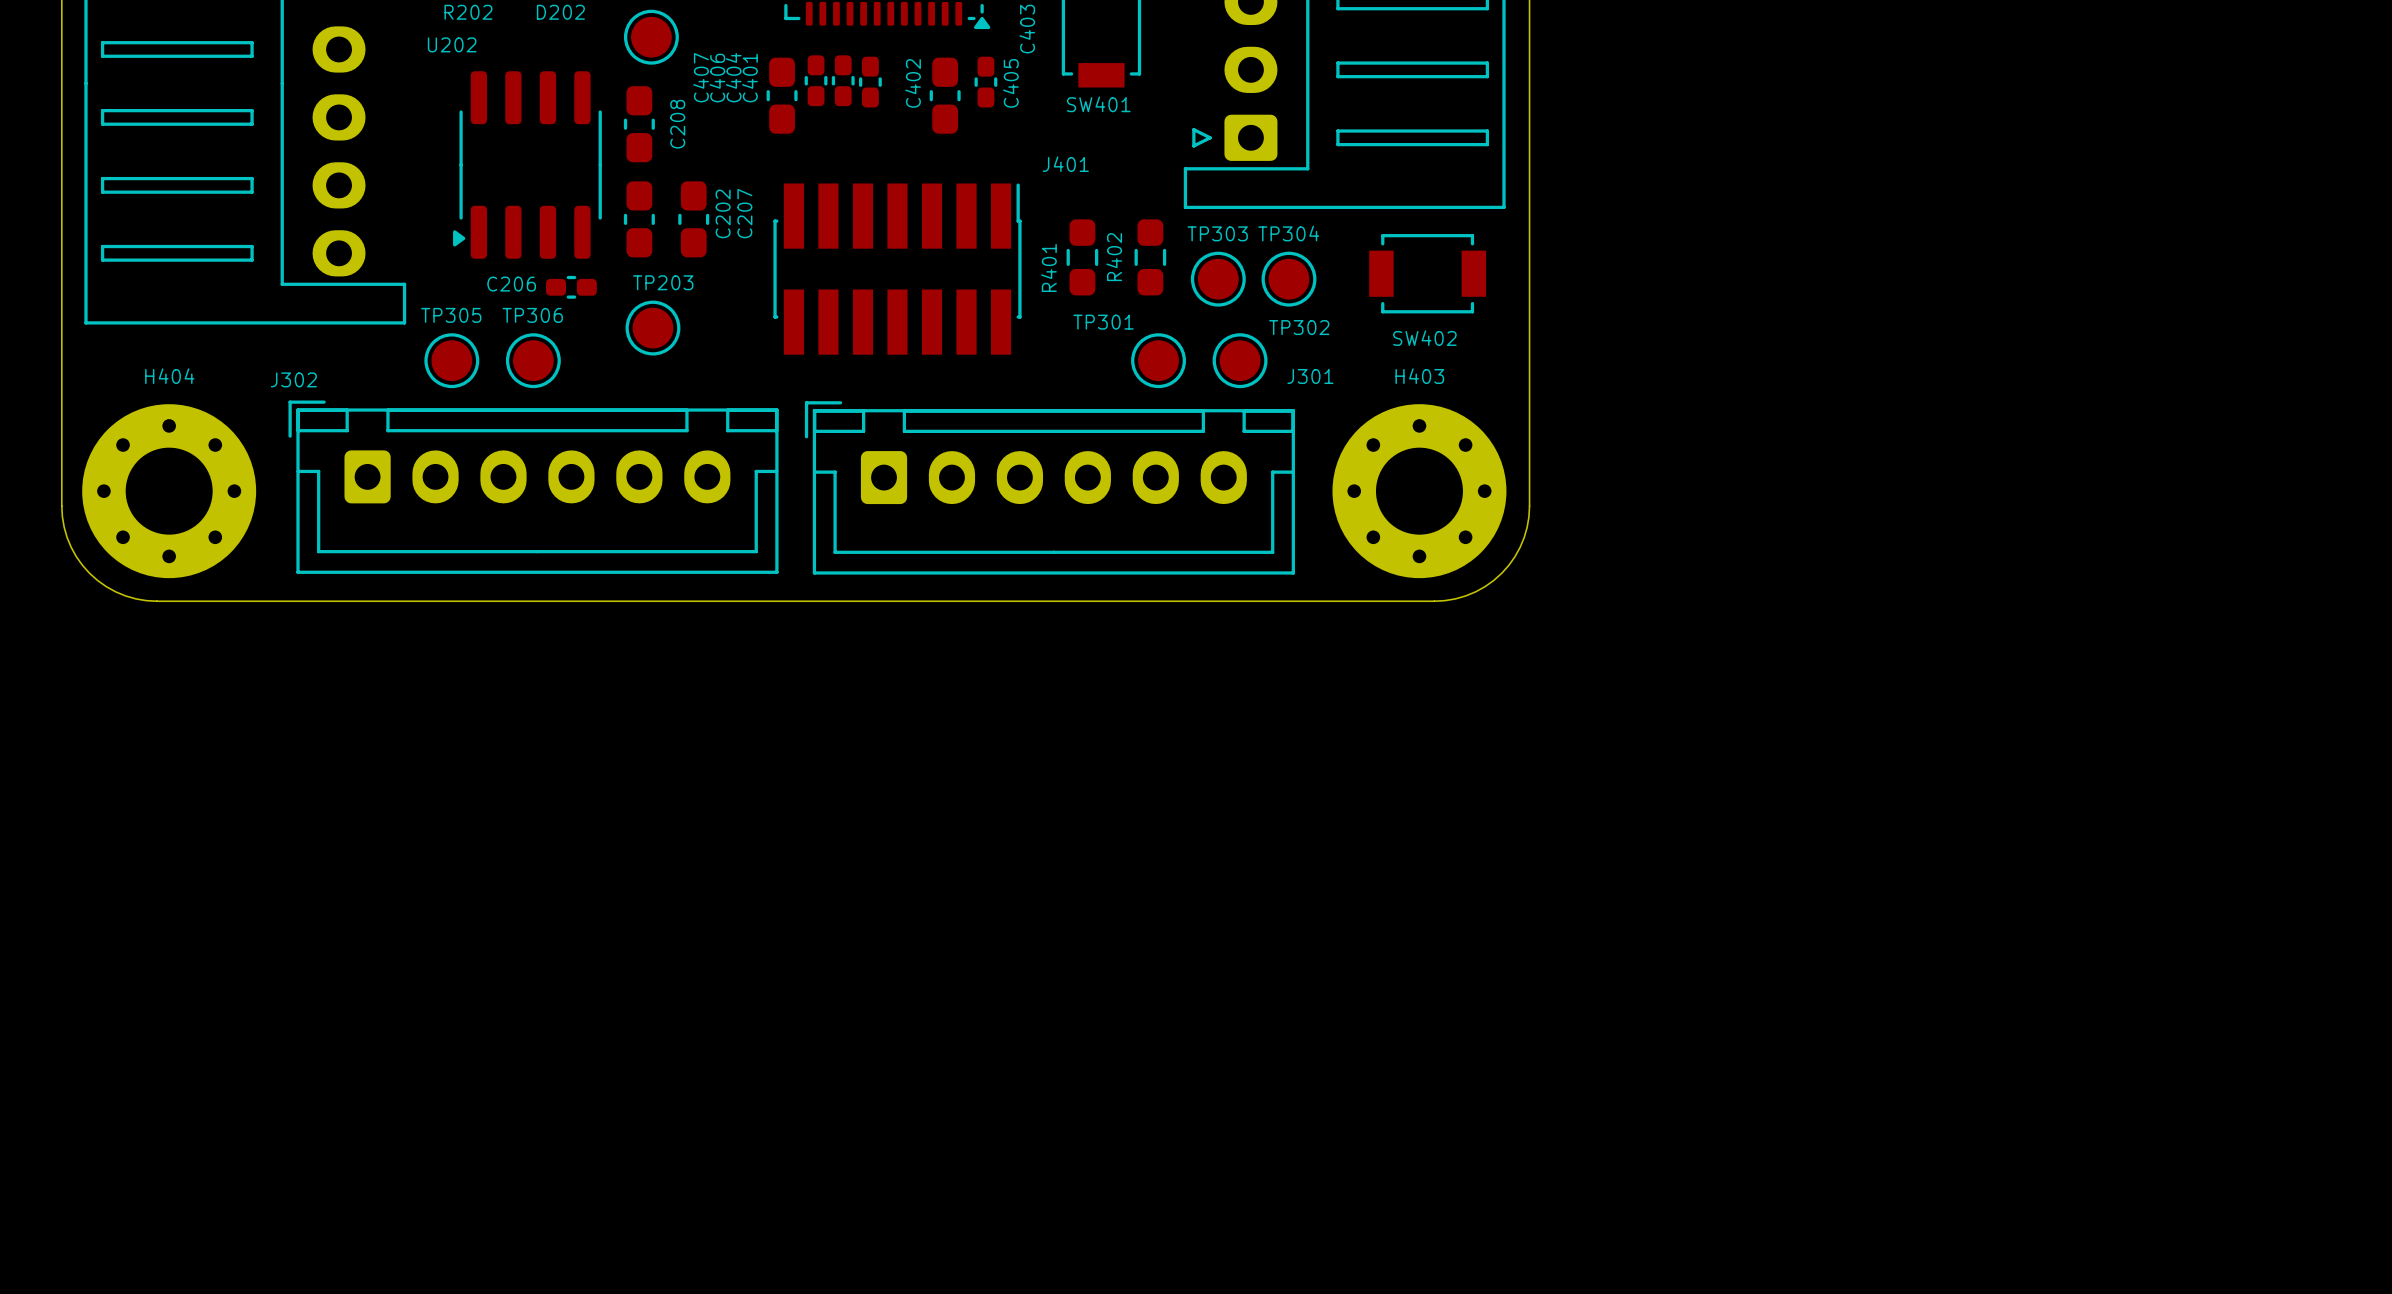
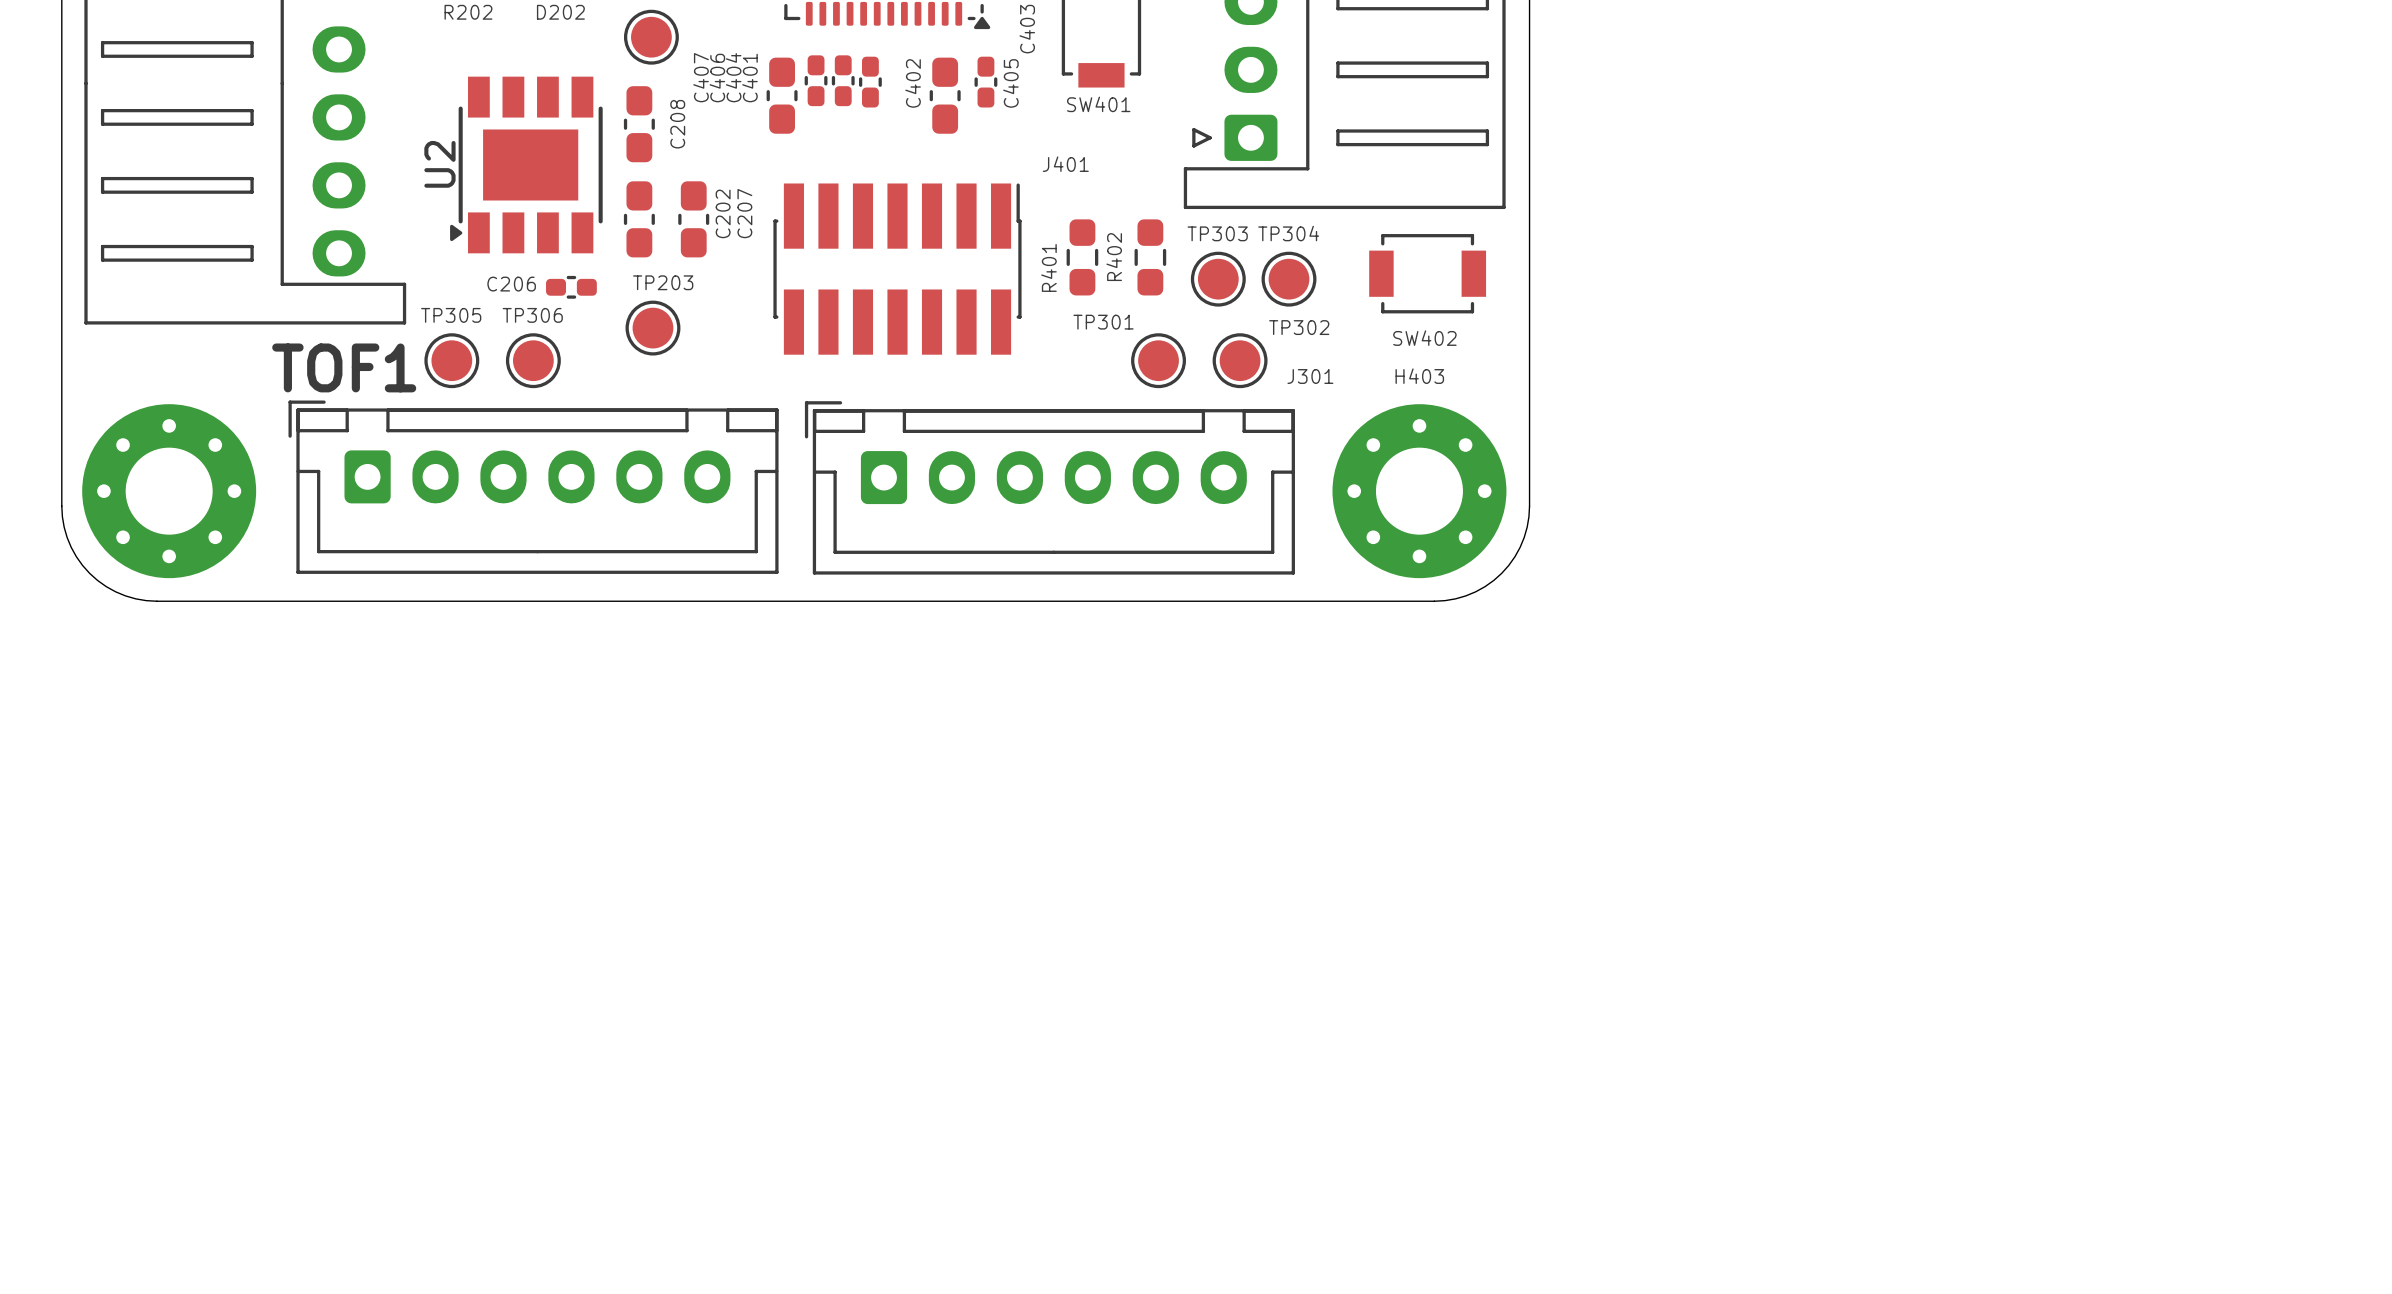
U2: none -> (526, 164)
U202: (527, 164) -> none
text: none -> TOF1 (344, 367)
H404 name: H404 (169, 376) -> none
J302 name: J302 (293, 379) -> none

